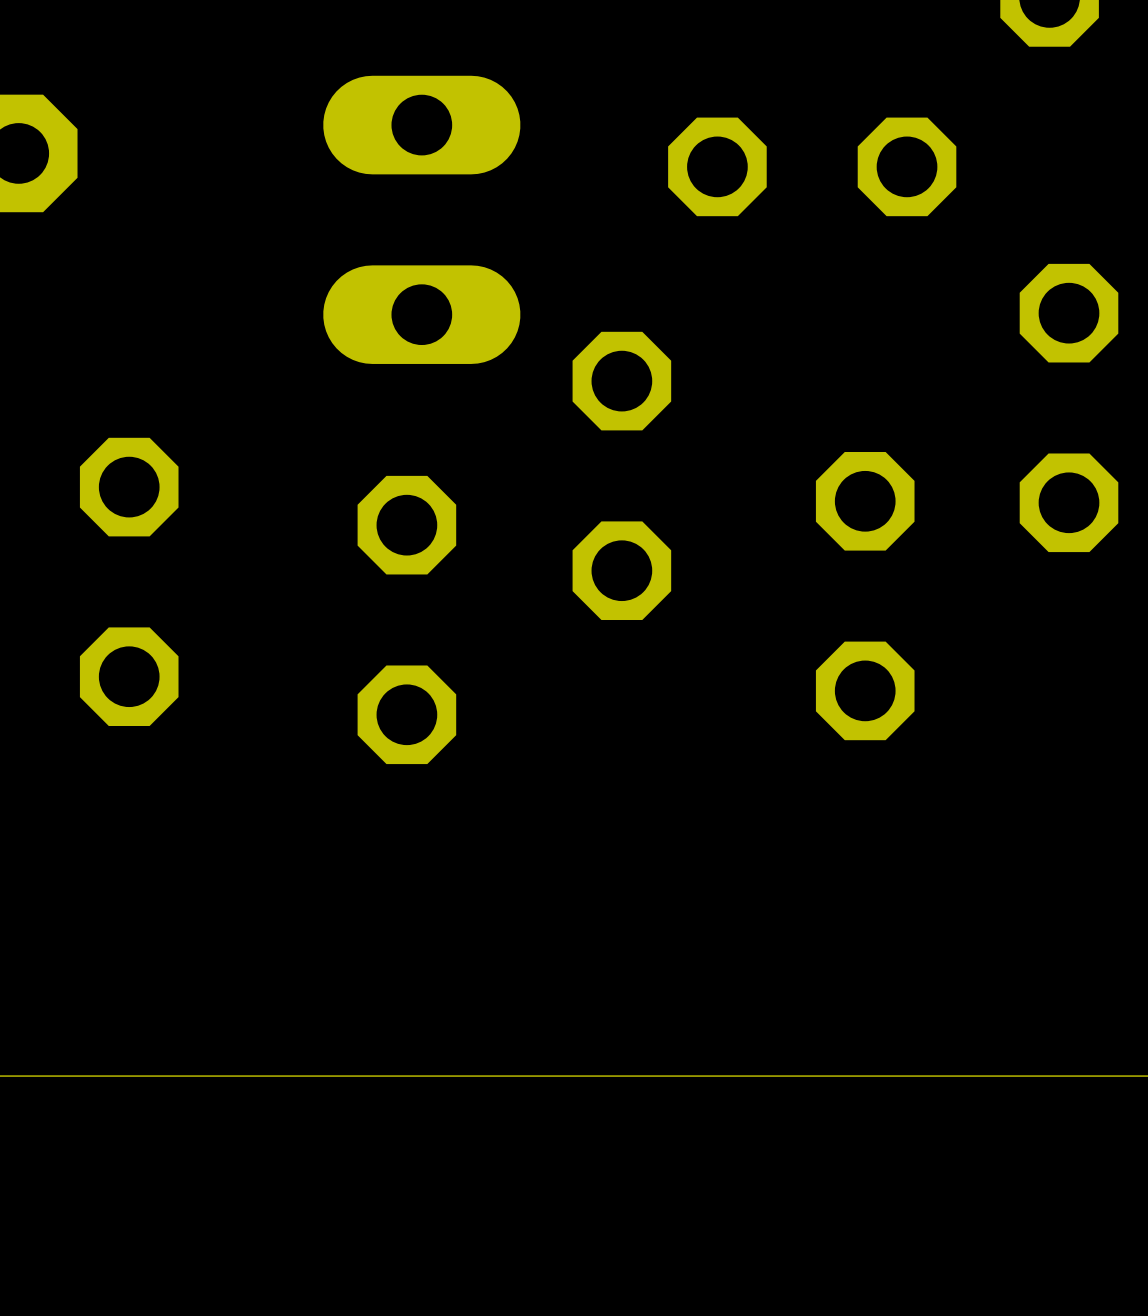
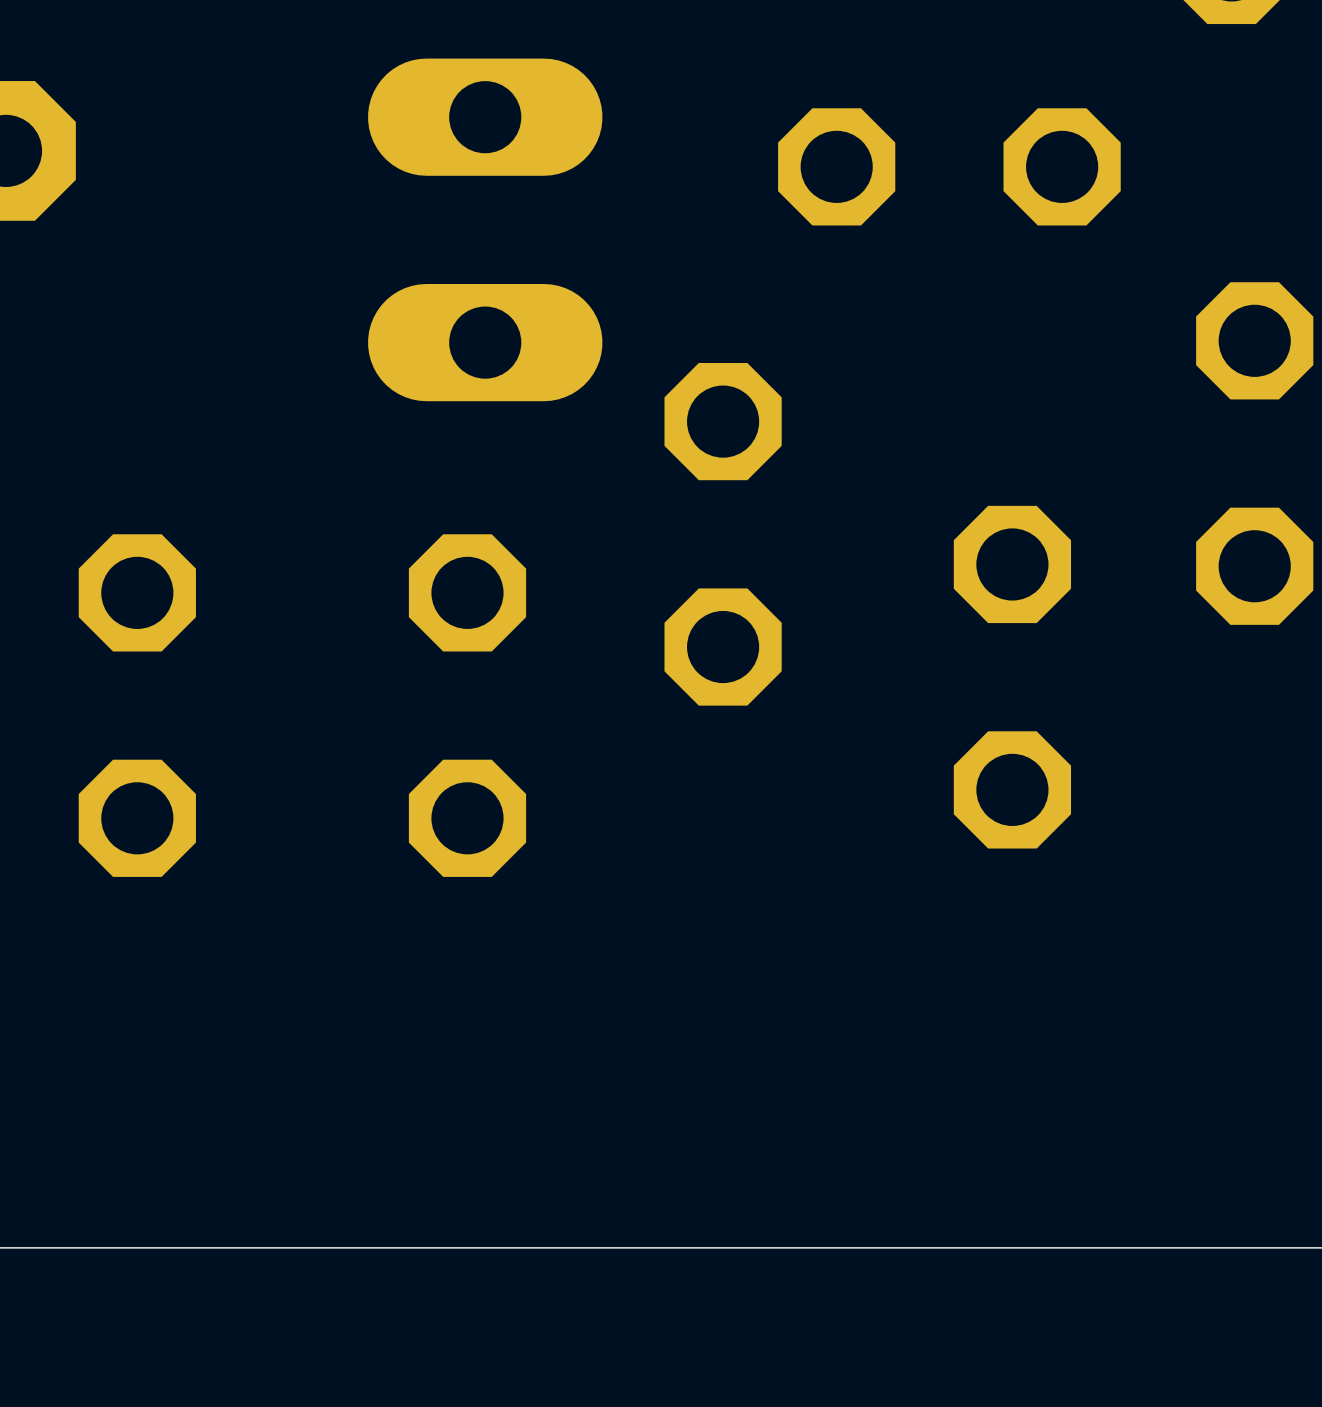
part position: (129, 581) -> (137, 705)

